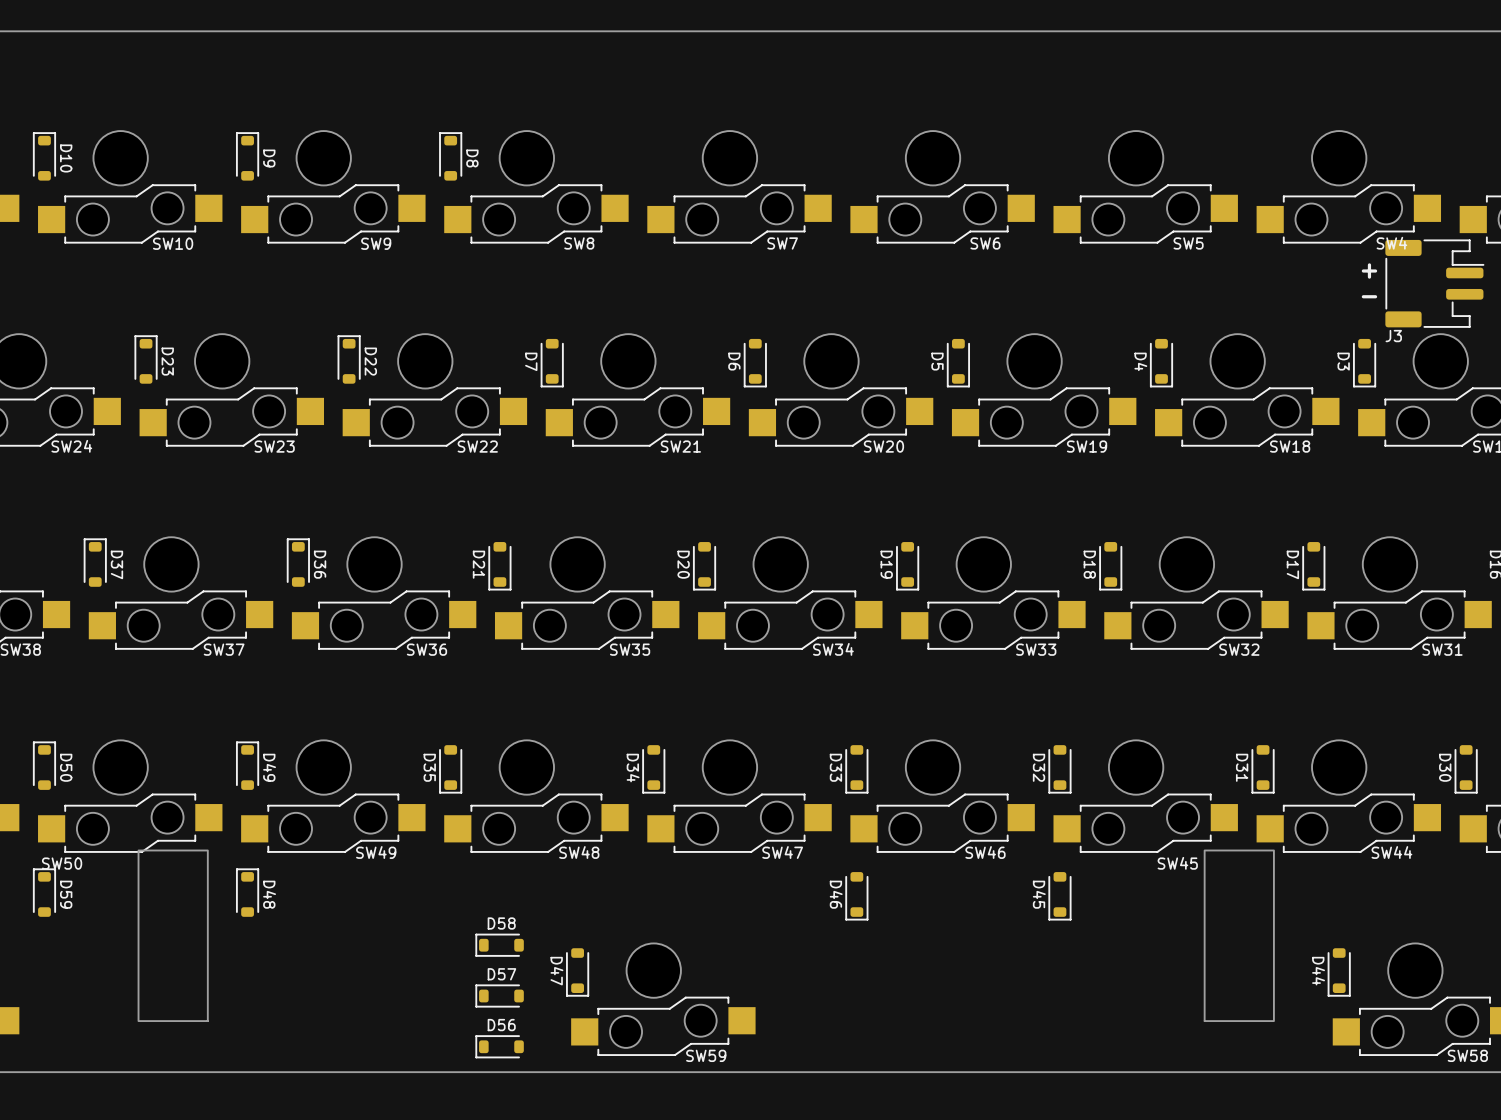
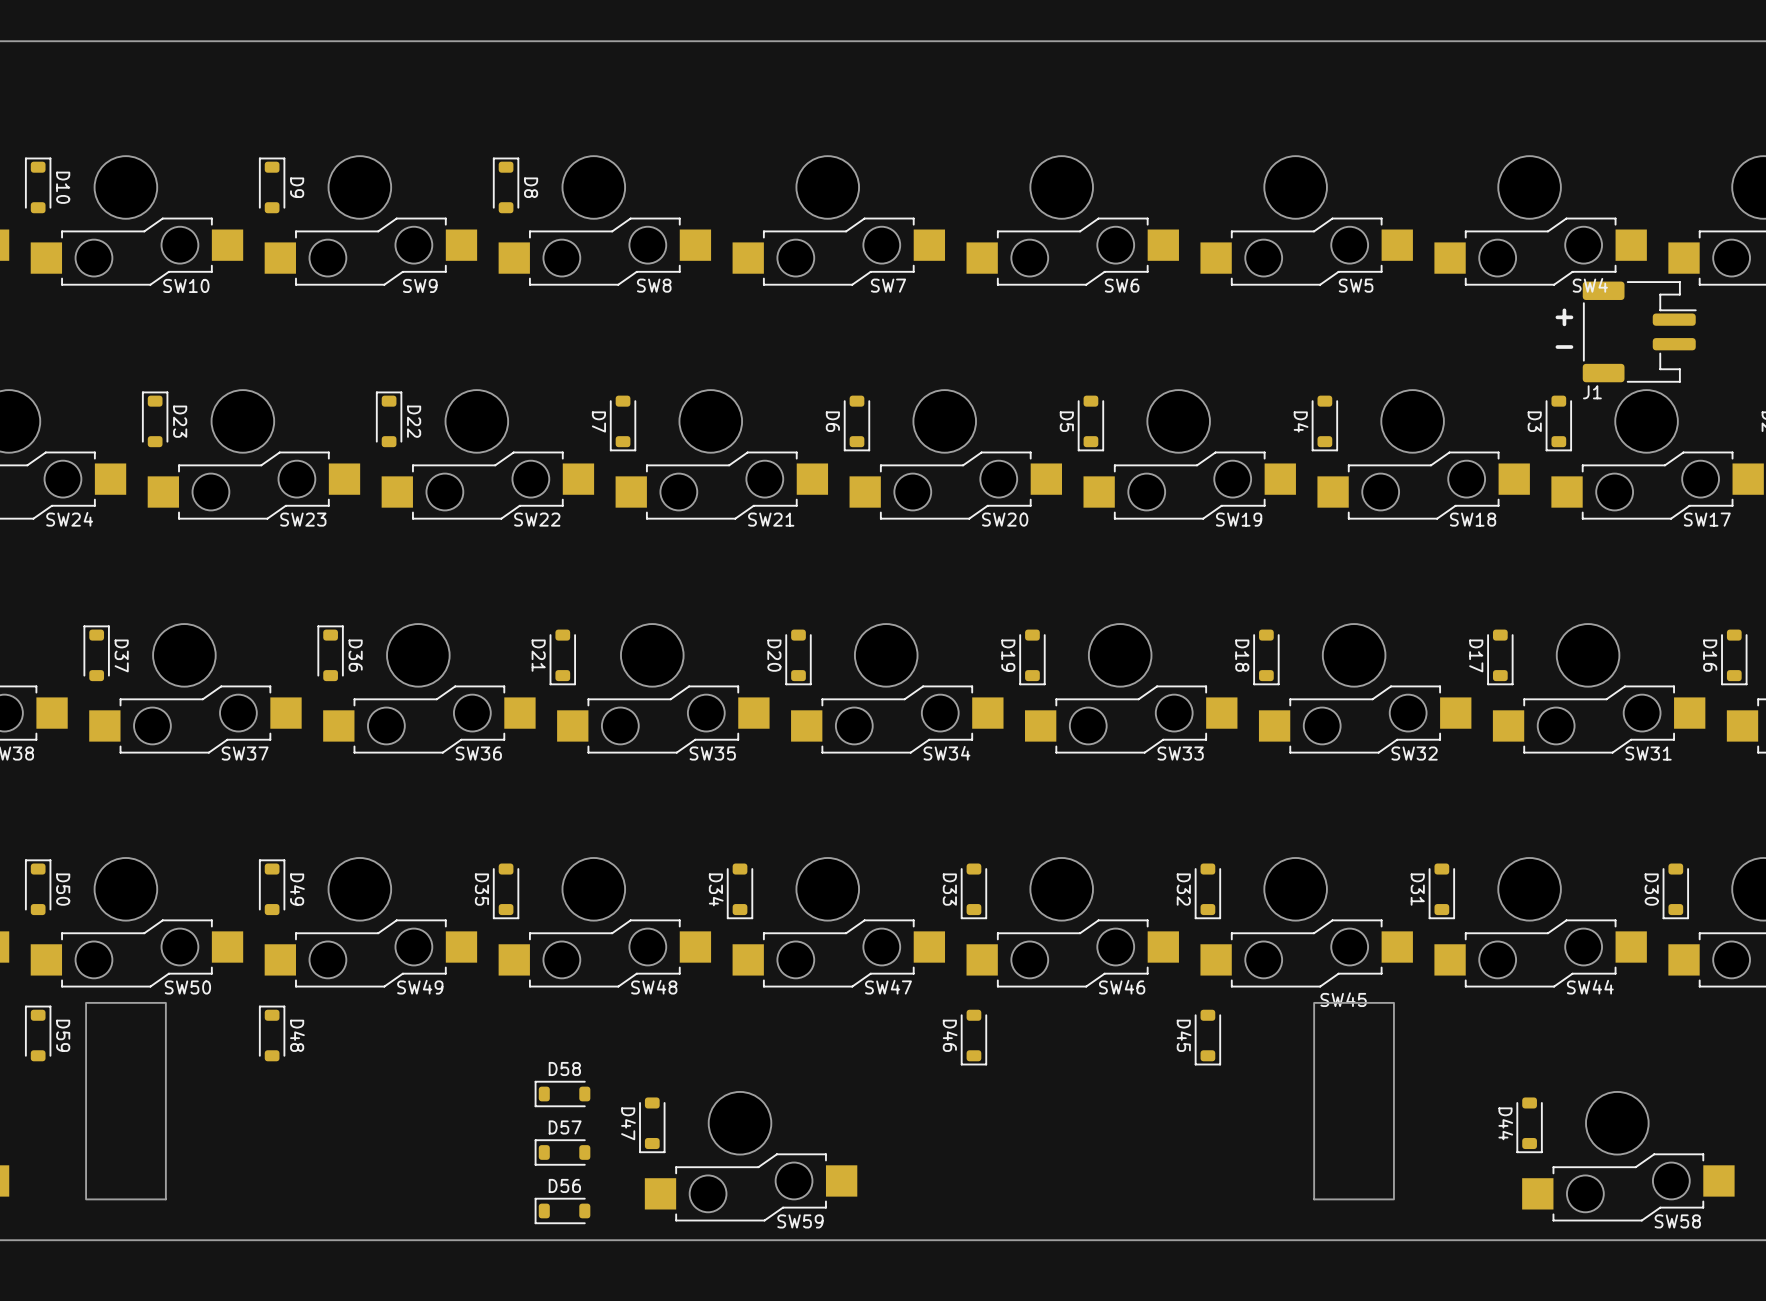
J3 name: J3 (1393, 336) -> J1 (1592, 392)
SW50 name position: SW50 (62, 863) -> SW50 (187, 987)
drawing position: (706, 935) -> (740, 1101)

